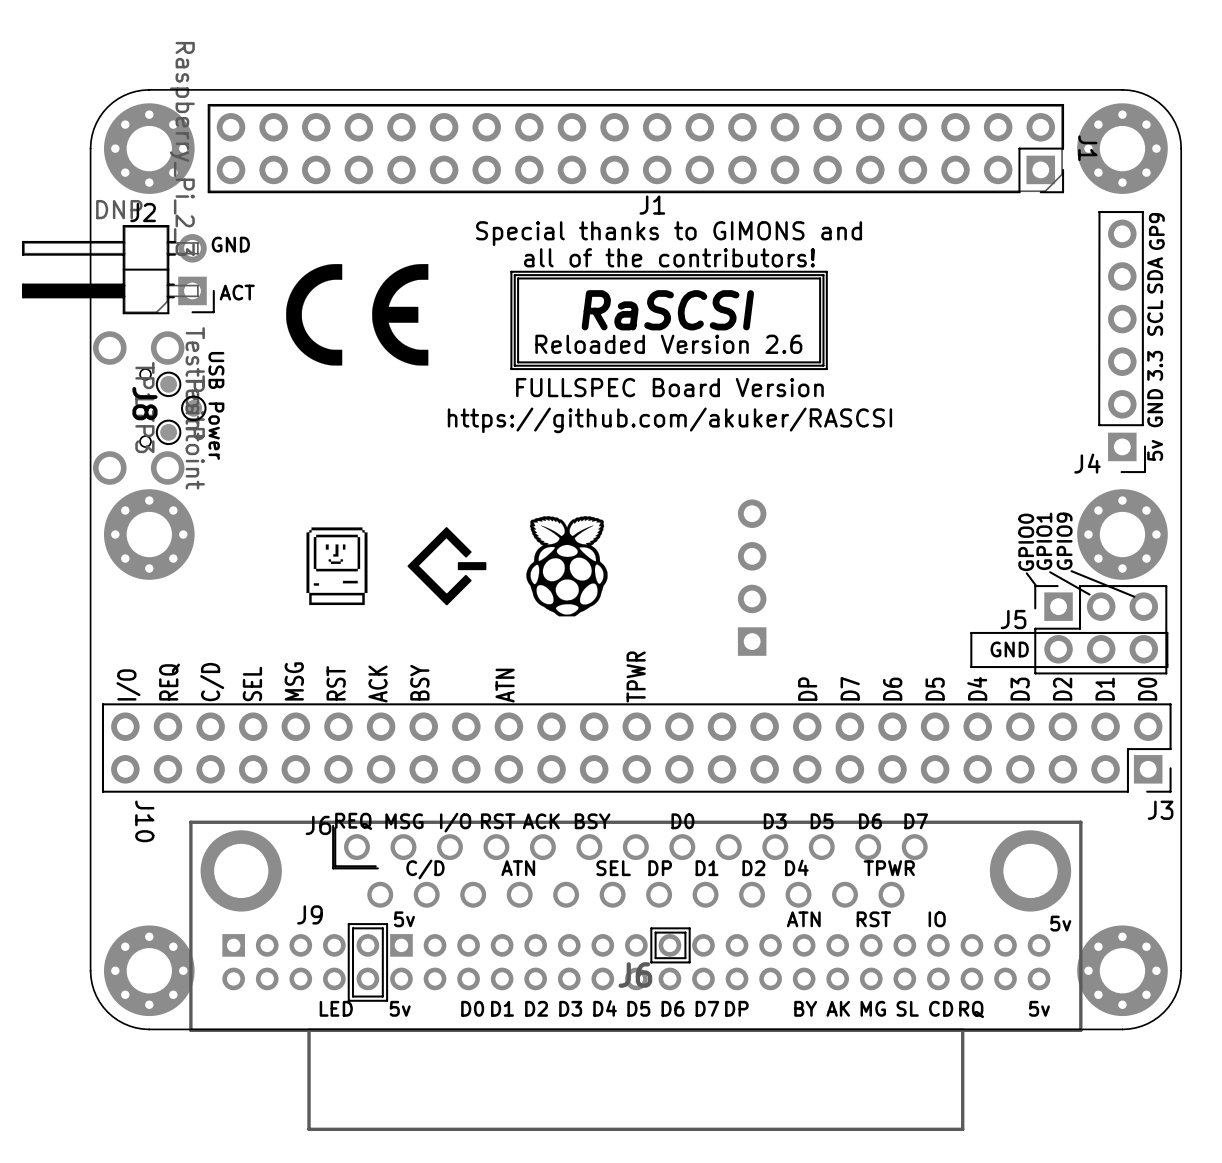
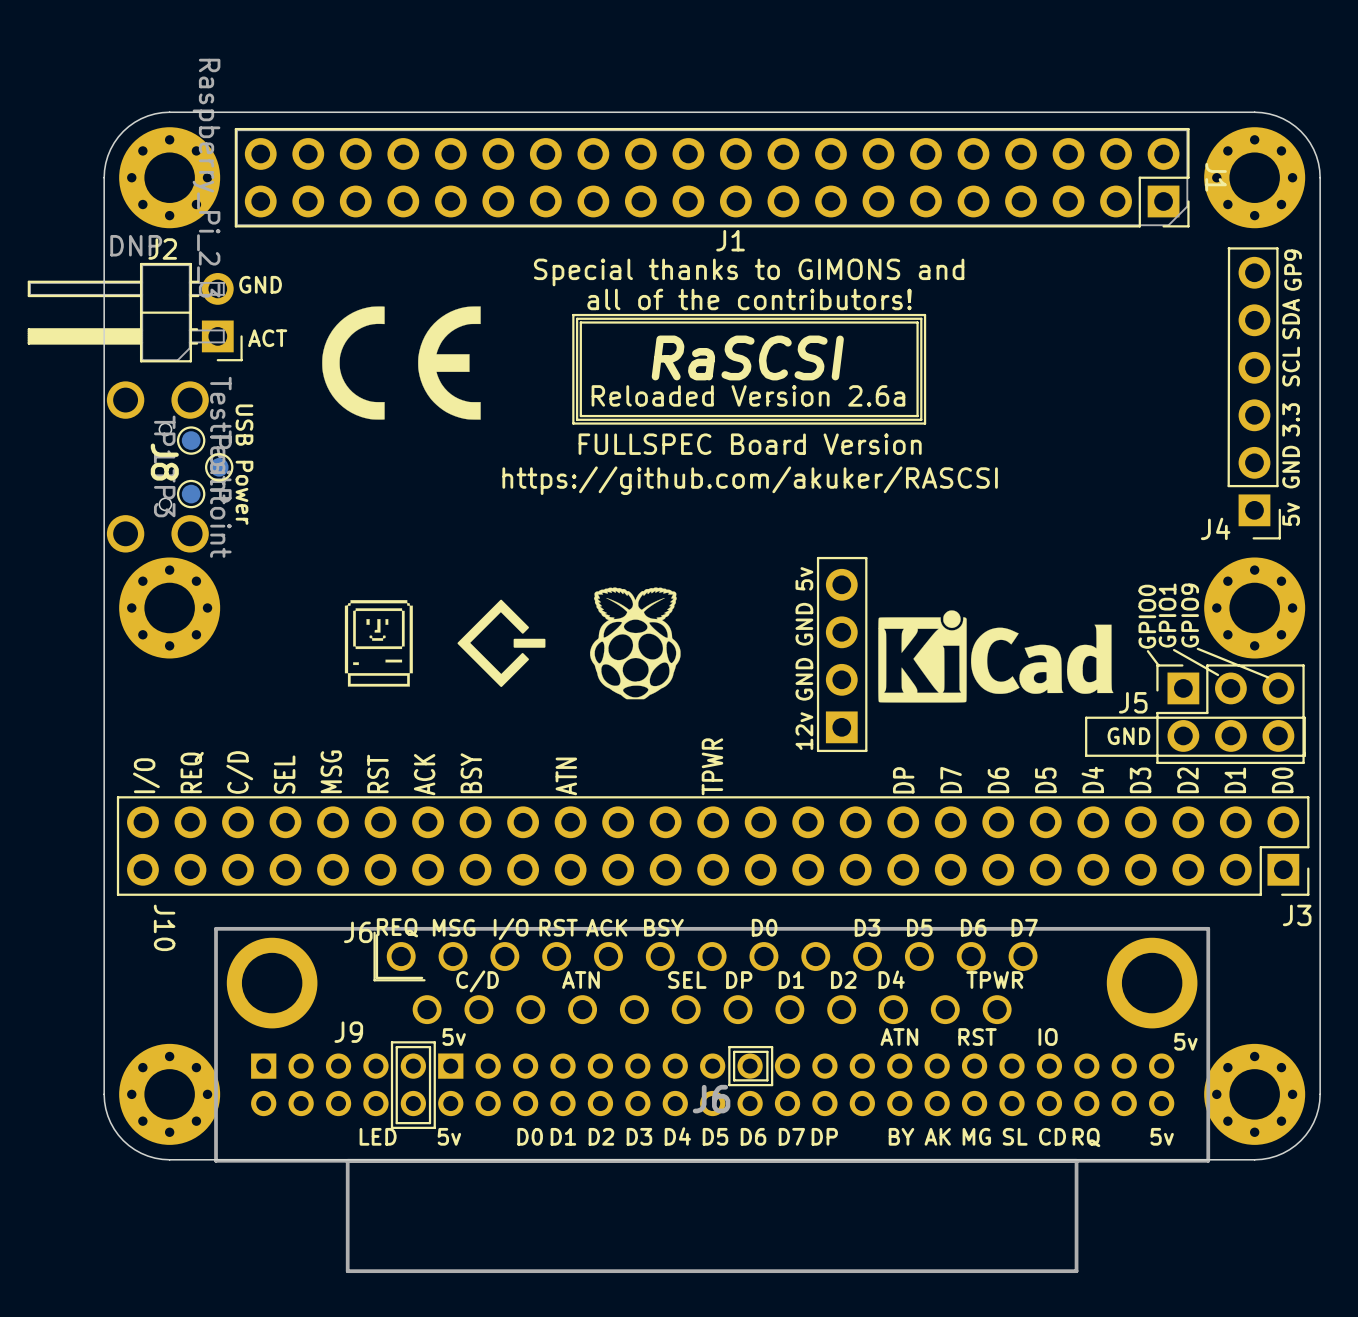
text: Reloaded Version 2.6 (668, 344) -> Reloaded Version 2.6a (748, 395)
line: none -> (866, 558) (818, 558) (818, 750) (866, 750) (866, 558)
text: none -> 5v (804, 578)
drawing: none -> [878, 610, 1114, 703]
text: none -> GND (804, 624)
text: none -> GND (804, 679)
text: none -> 12v (804, 731)

